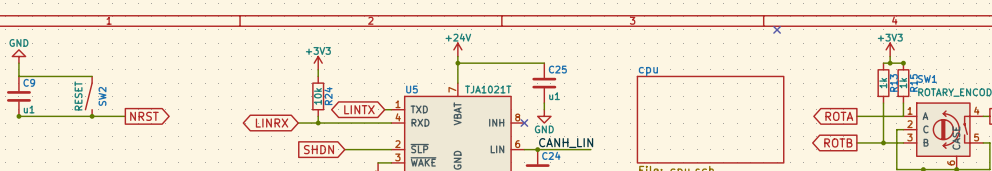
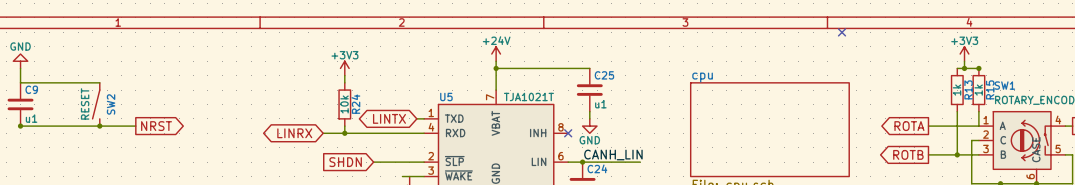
wire: none -> (402, 176) (409, 176)

